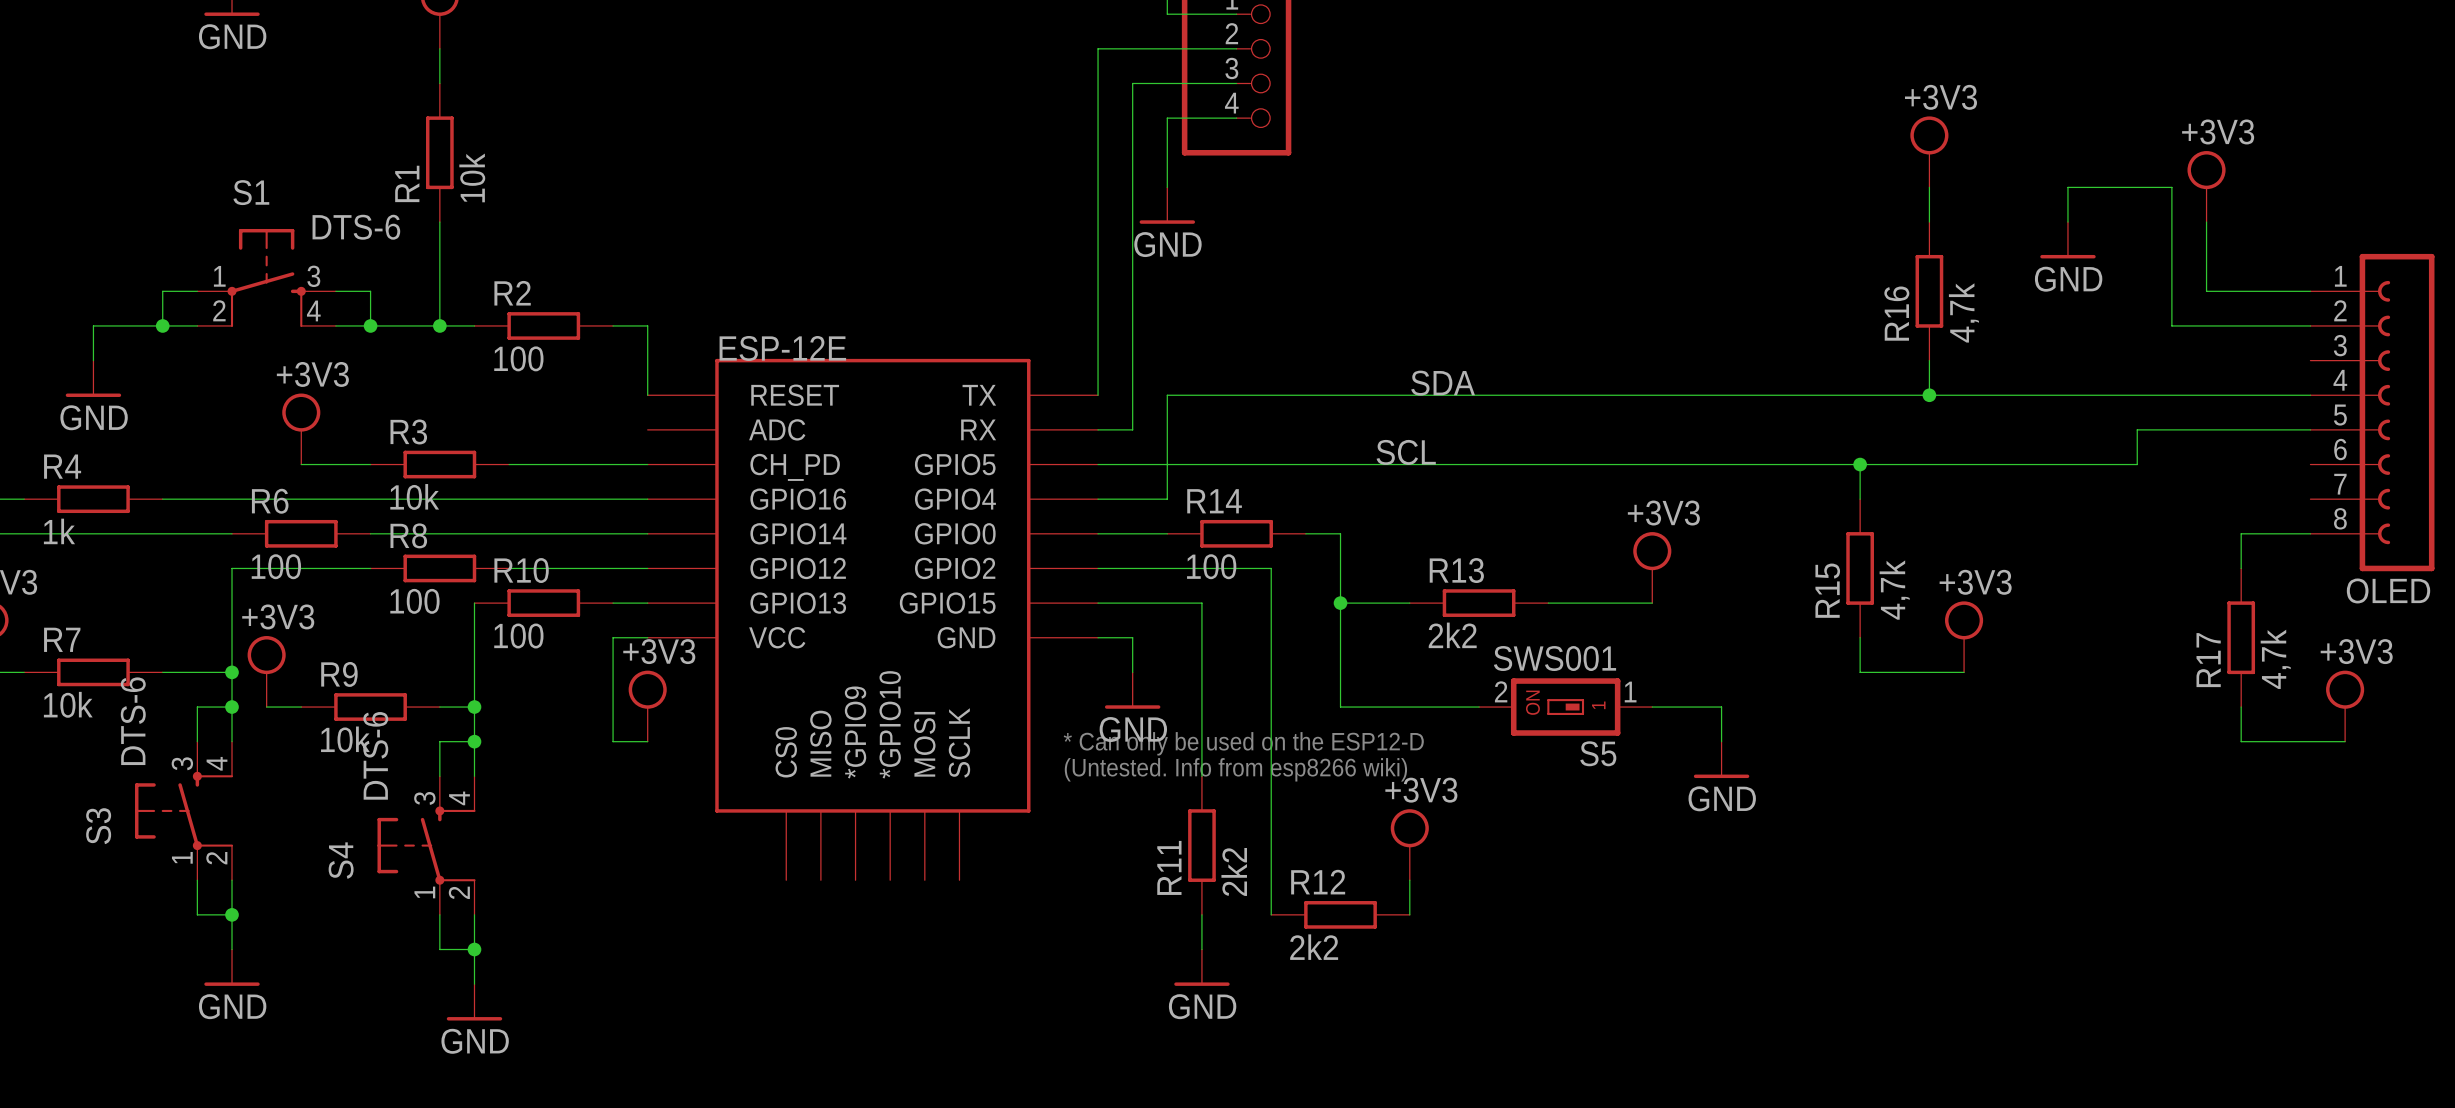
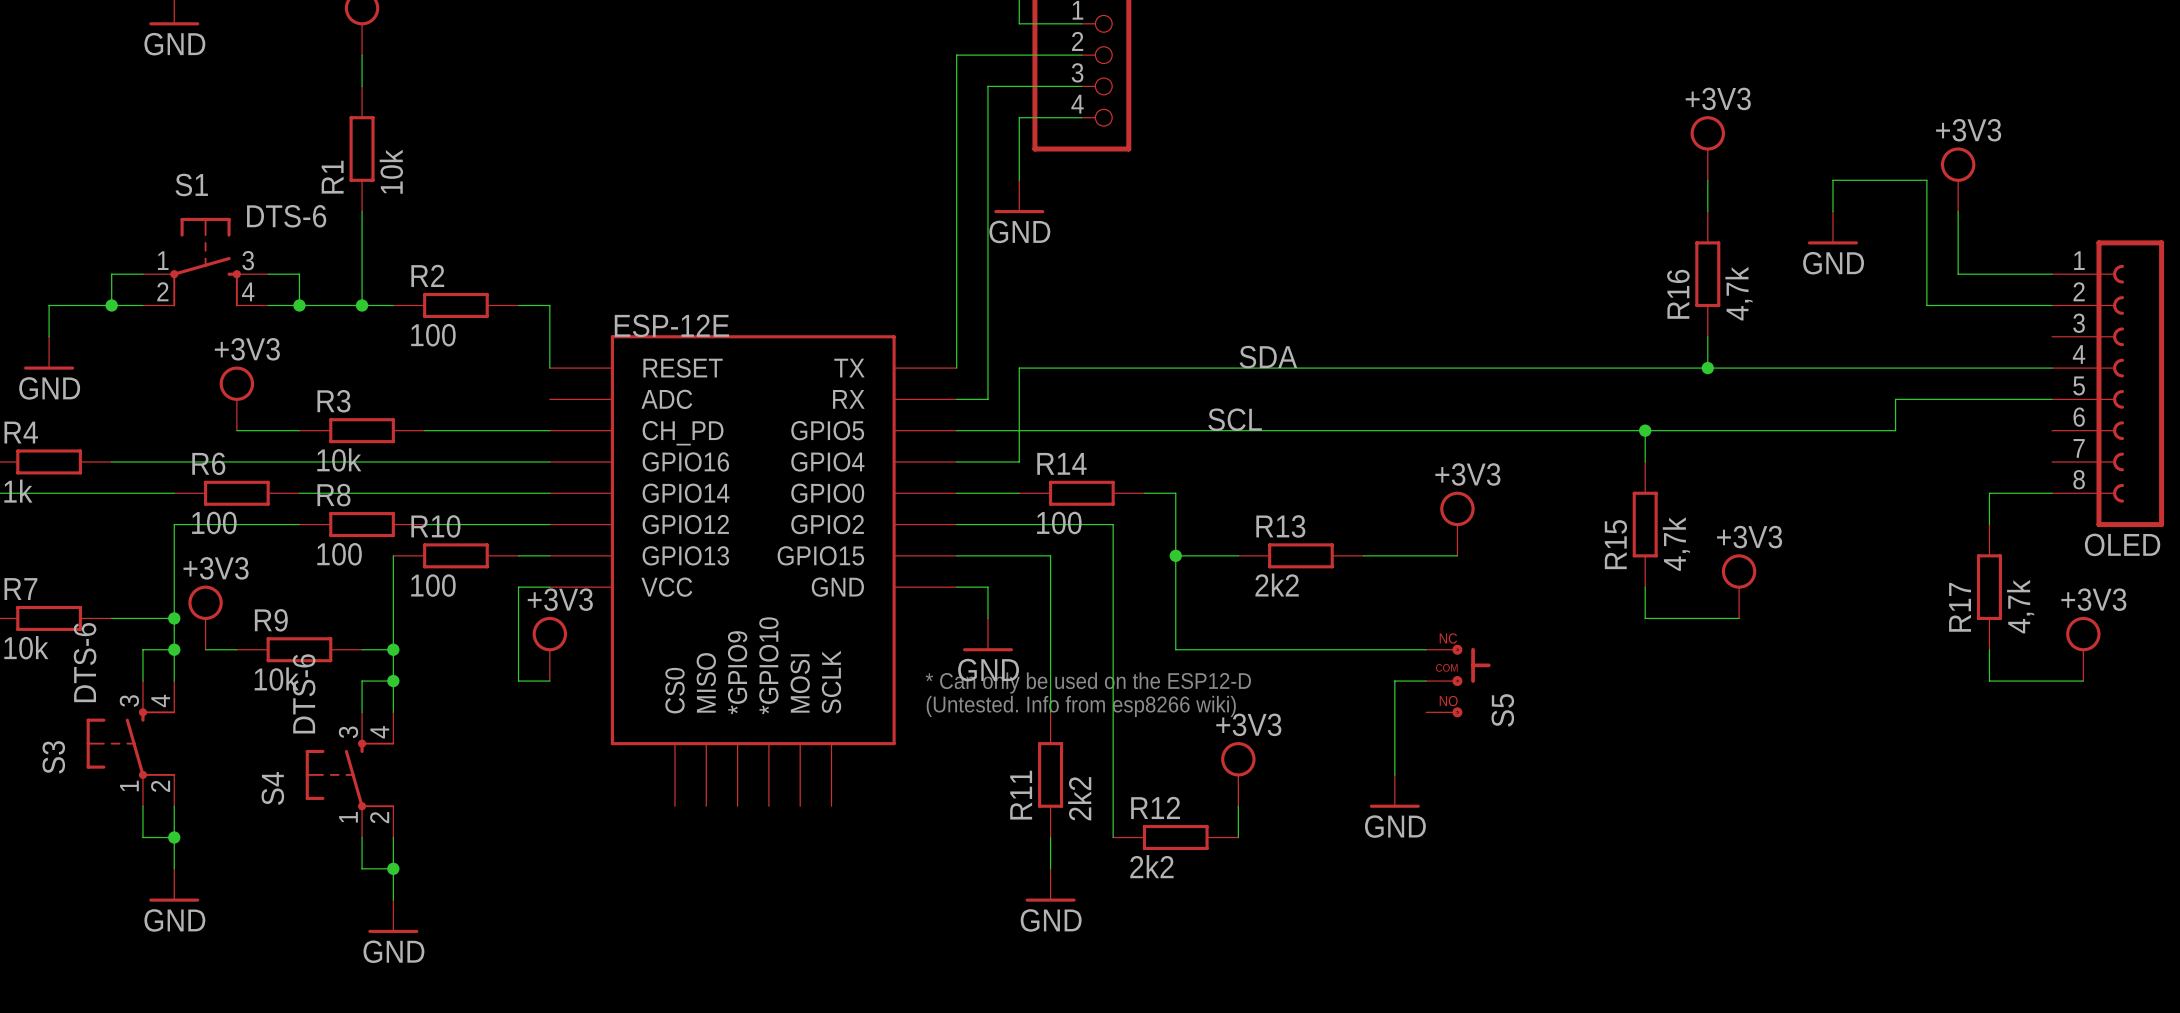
S5 value: SWS001 (1555, 658) -> none
S5 symbol: [1479, 678, 1653, 736] -> [1426, 644, 1491, 718]
wire: none -> (1300, 649) (1426, 649)
wire: (1652, 707) (1721, 707) (1721, 741) -> none
wire: none -> (1426, 681) (1394, 681) (1394, 774)
S5 name position: S5 (1598, 753) -> S5 (1502, 710)
power symbol position: GND (1721, 759) -> GND (1394, 791)

